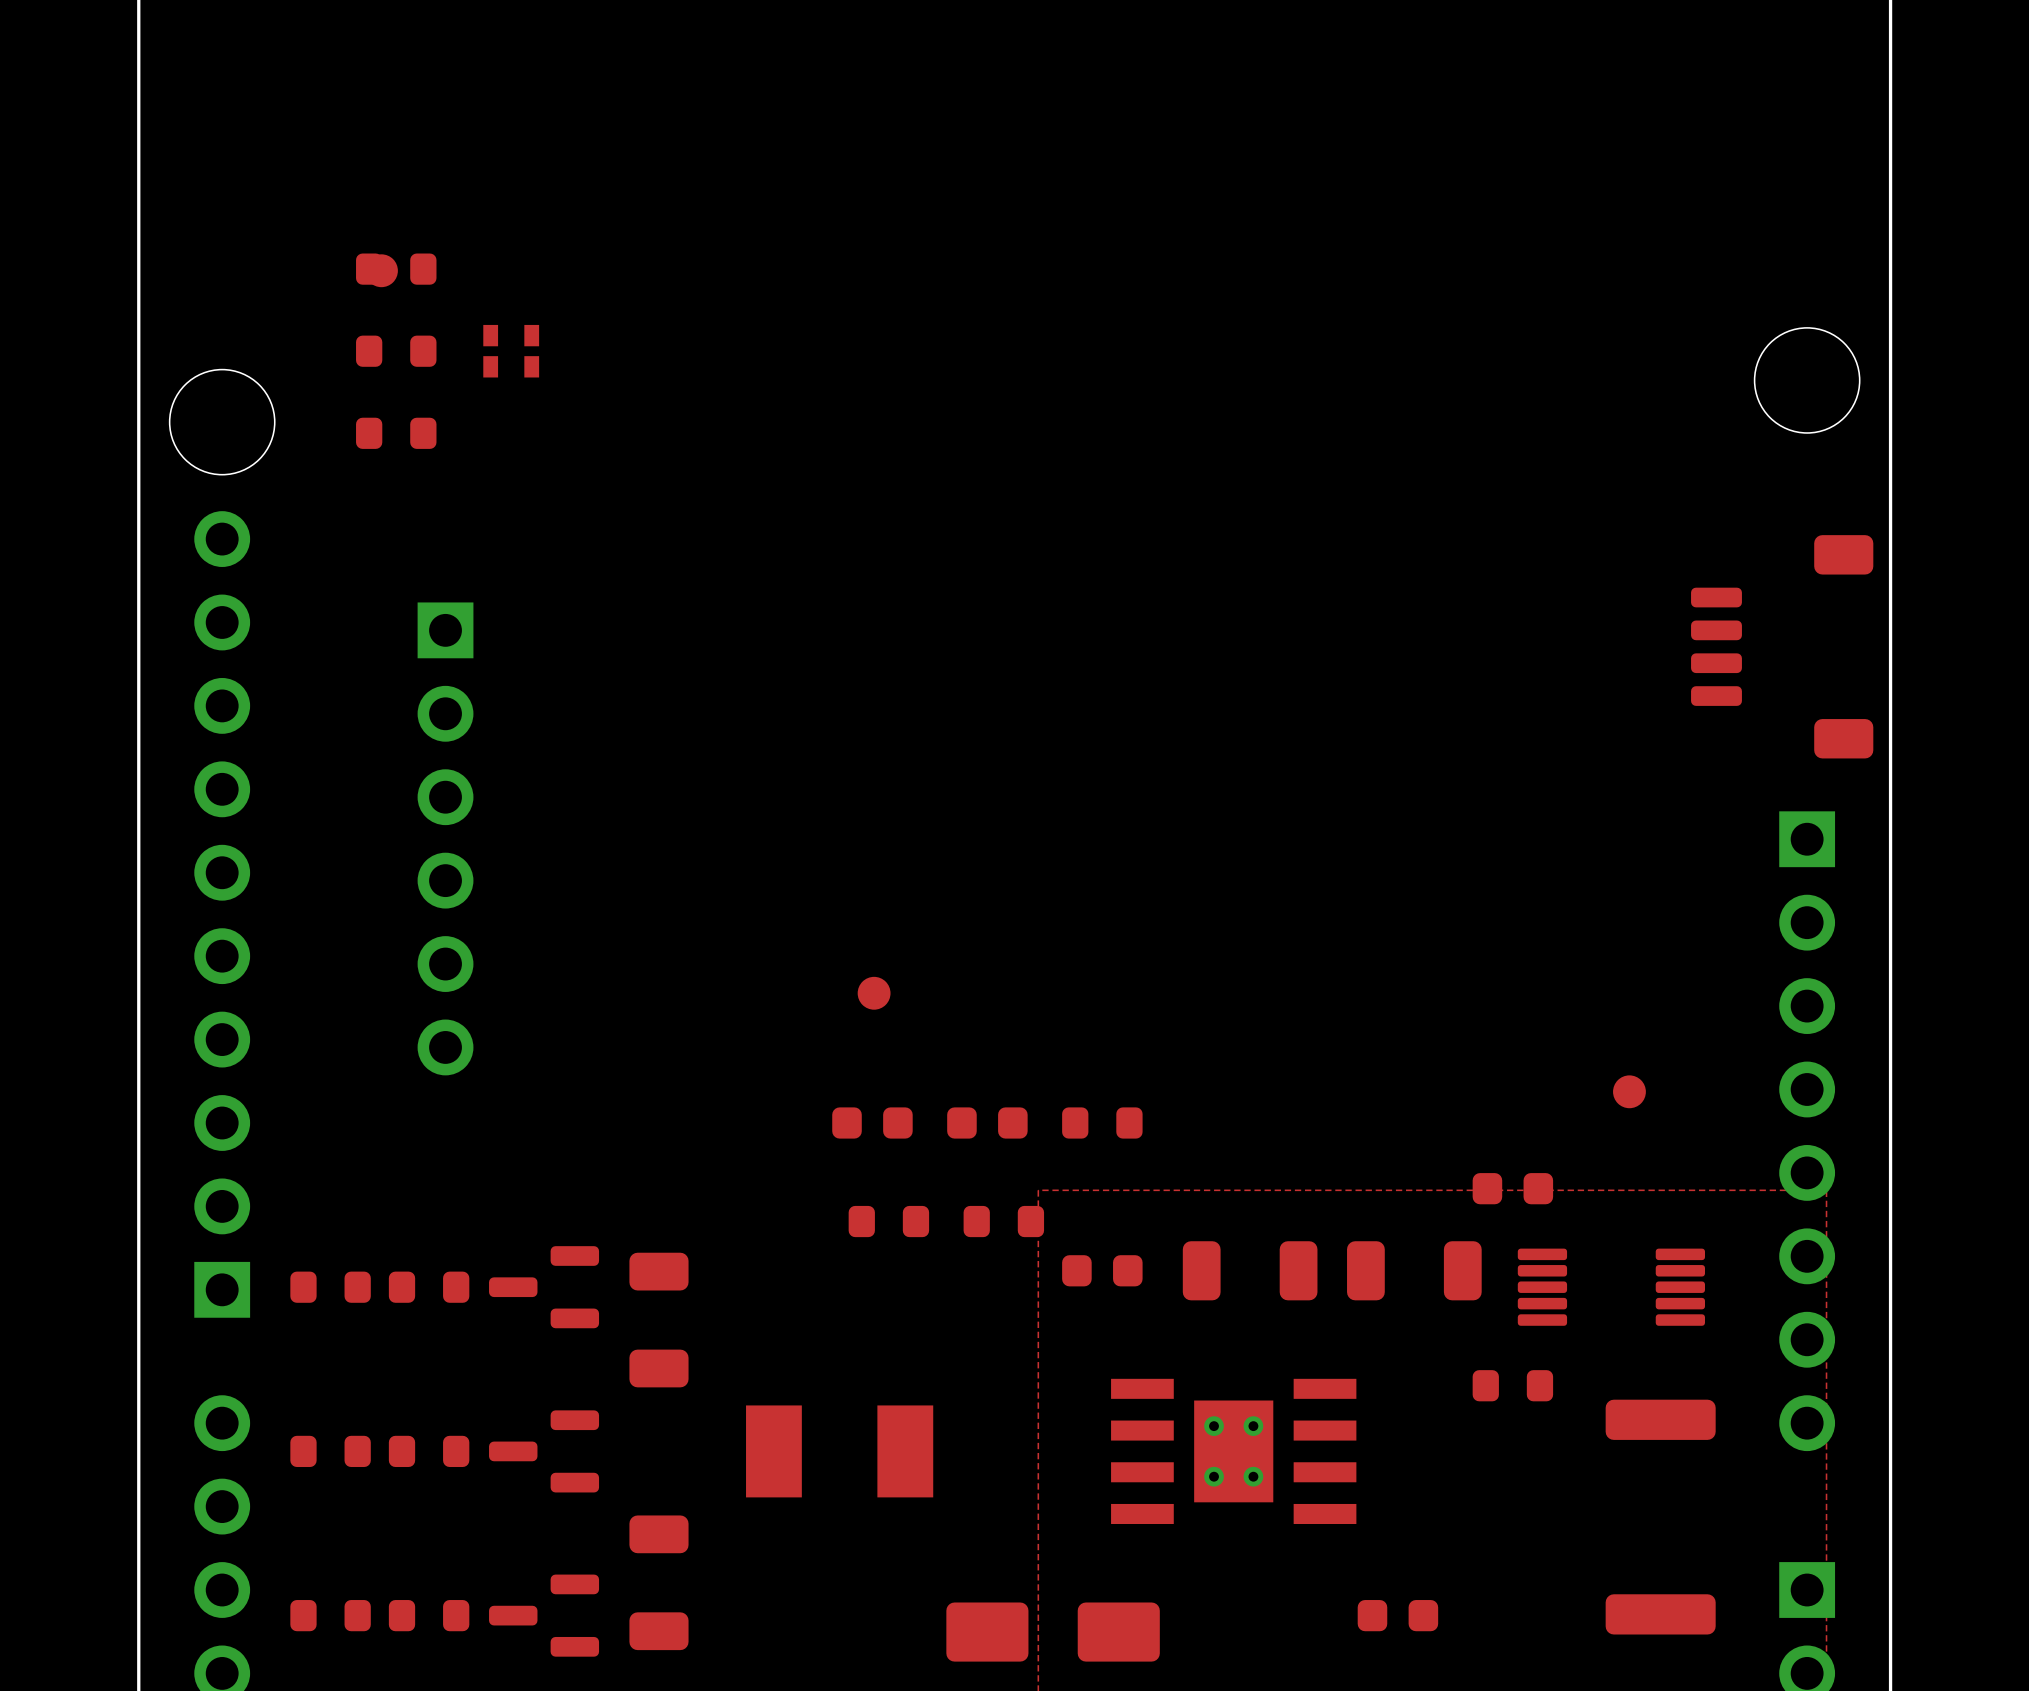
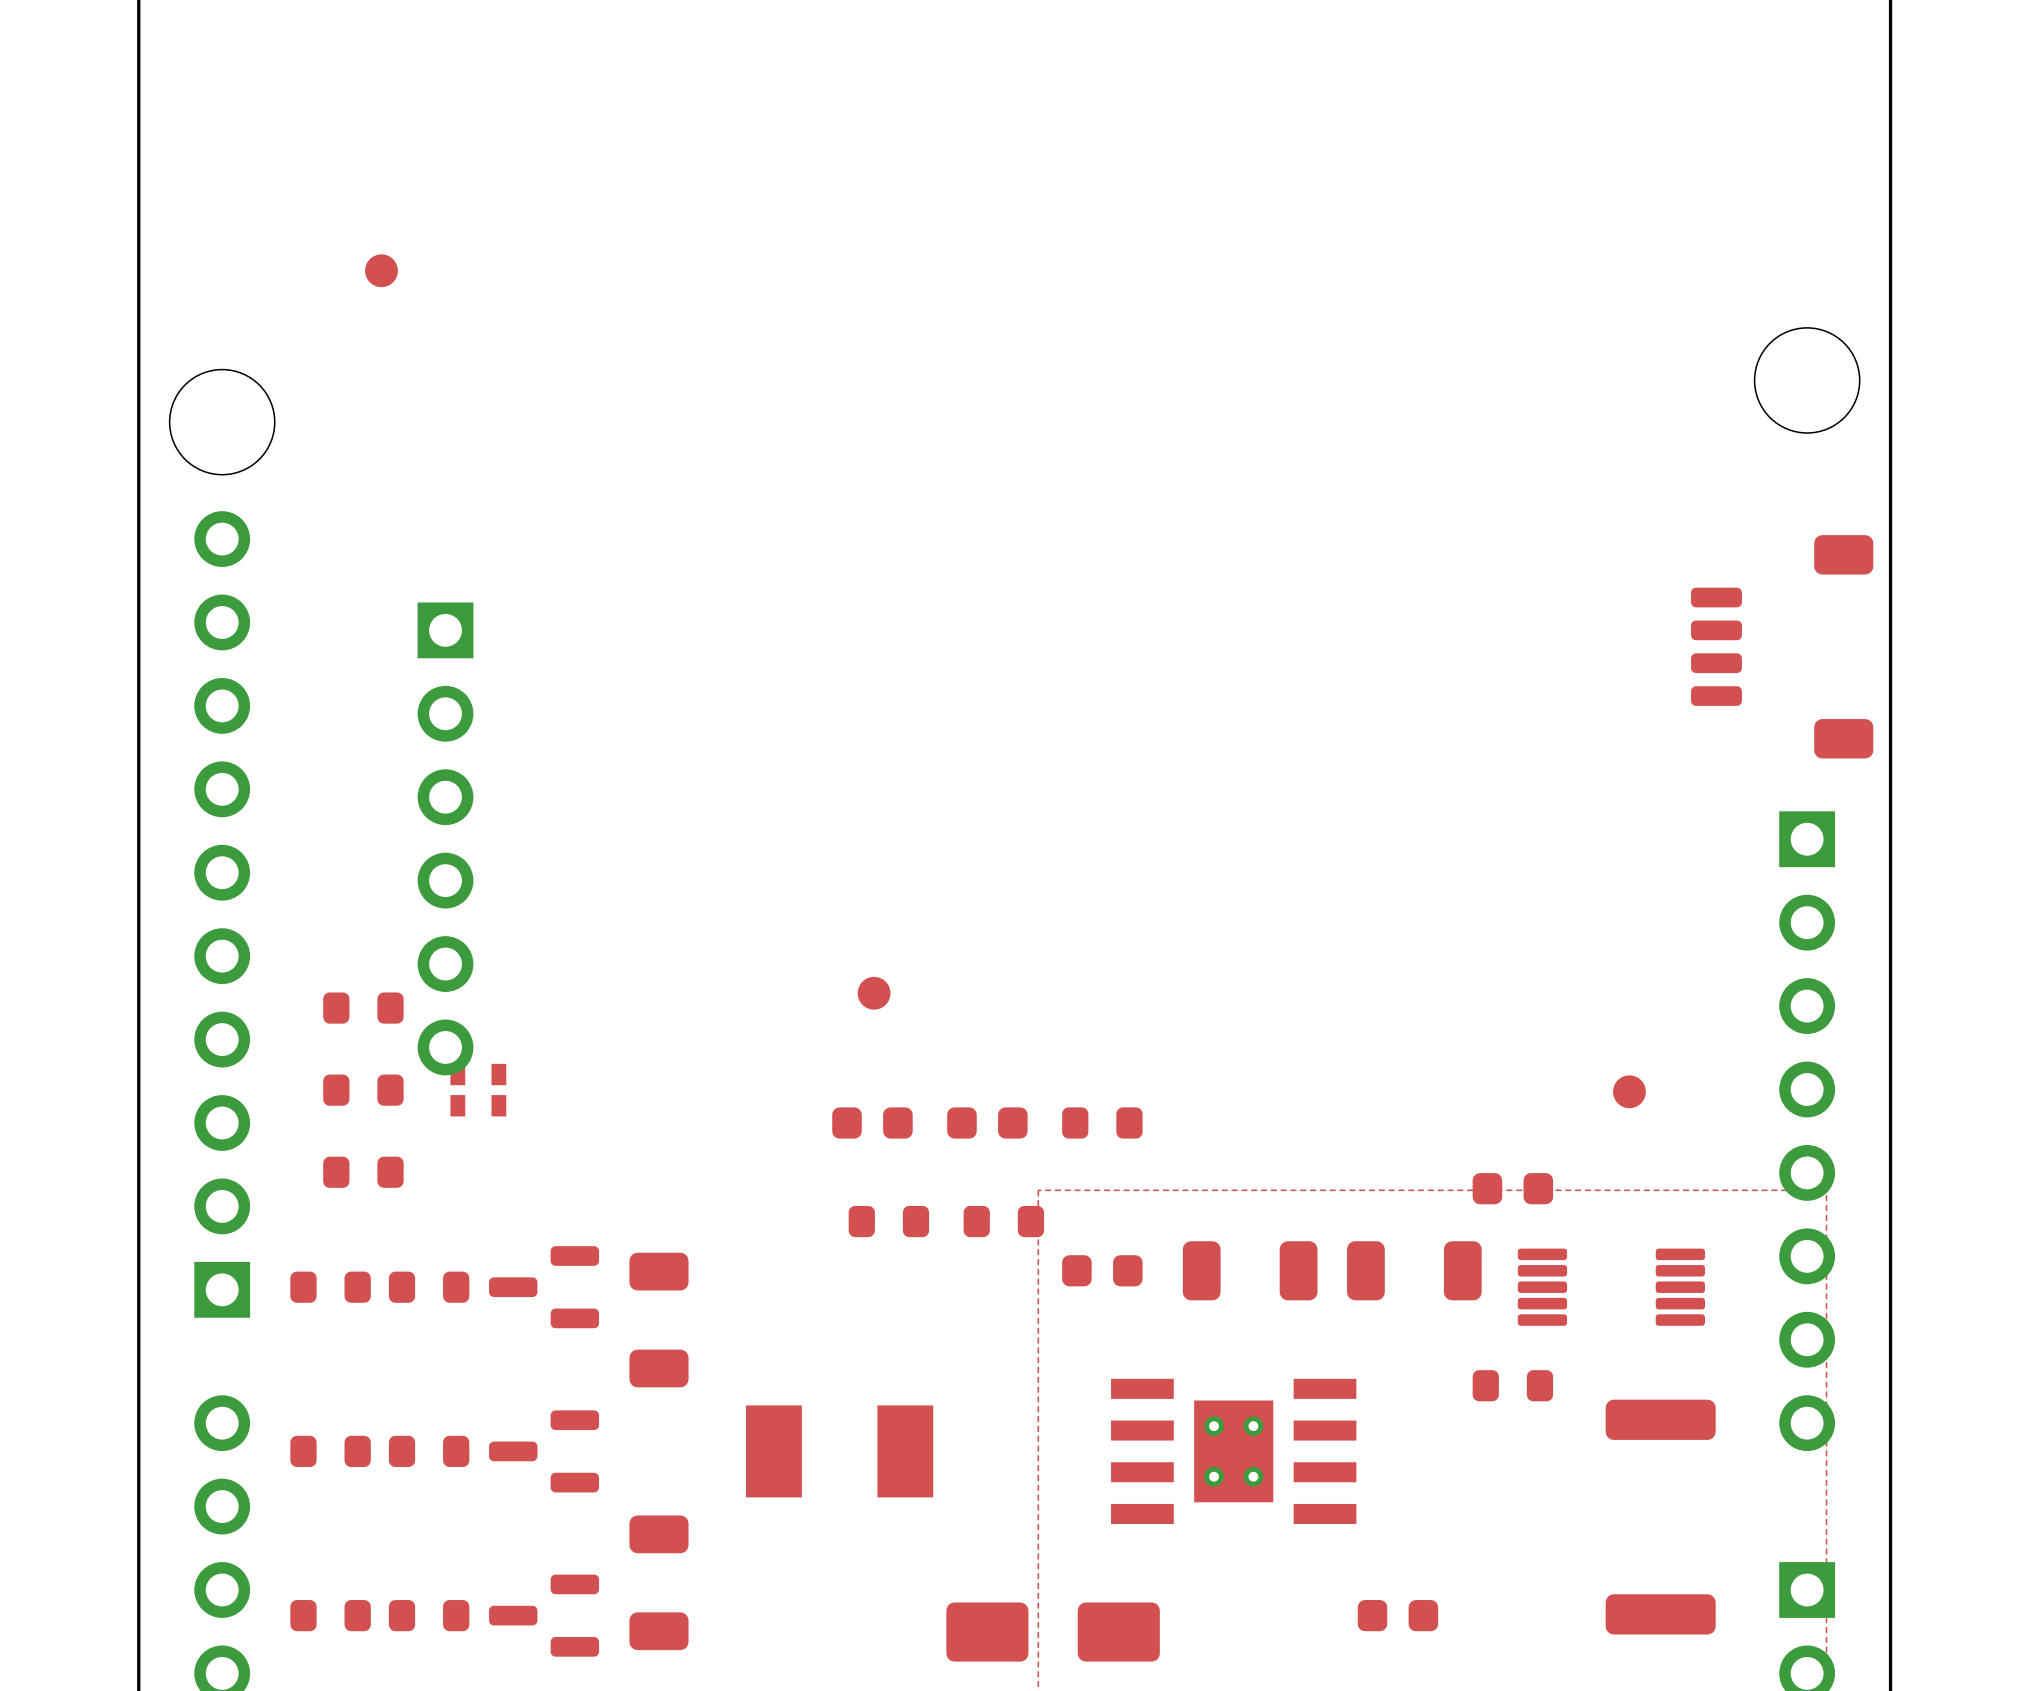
part: (396, 269) -> none
part: (396, 351) -> none
part position: (511, 351) -> (478, 1090)
part: (396, 433) -> none
part: none -> (363, 1008)
part: none -> (363, 1090)
part: none -> (363, 1172)

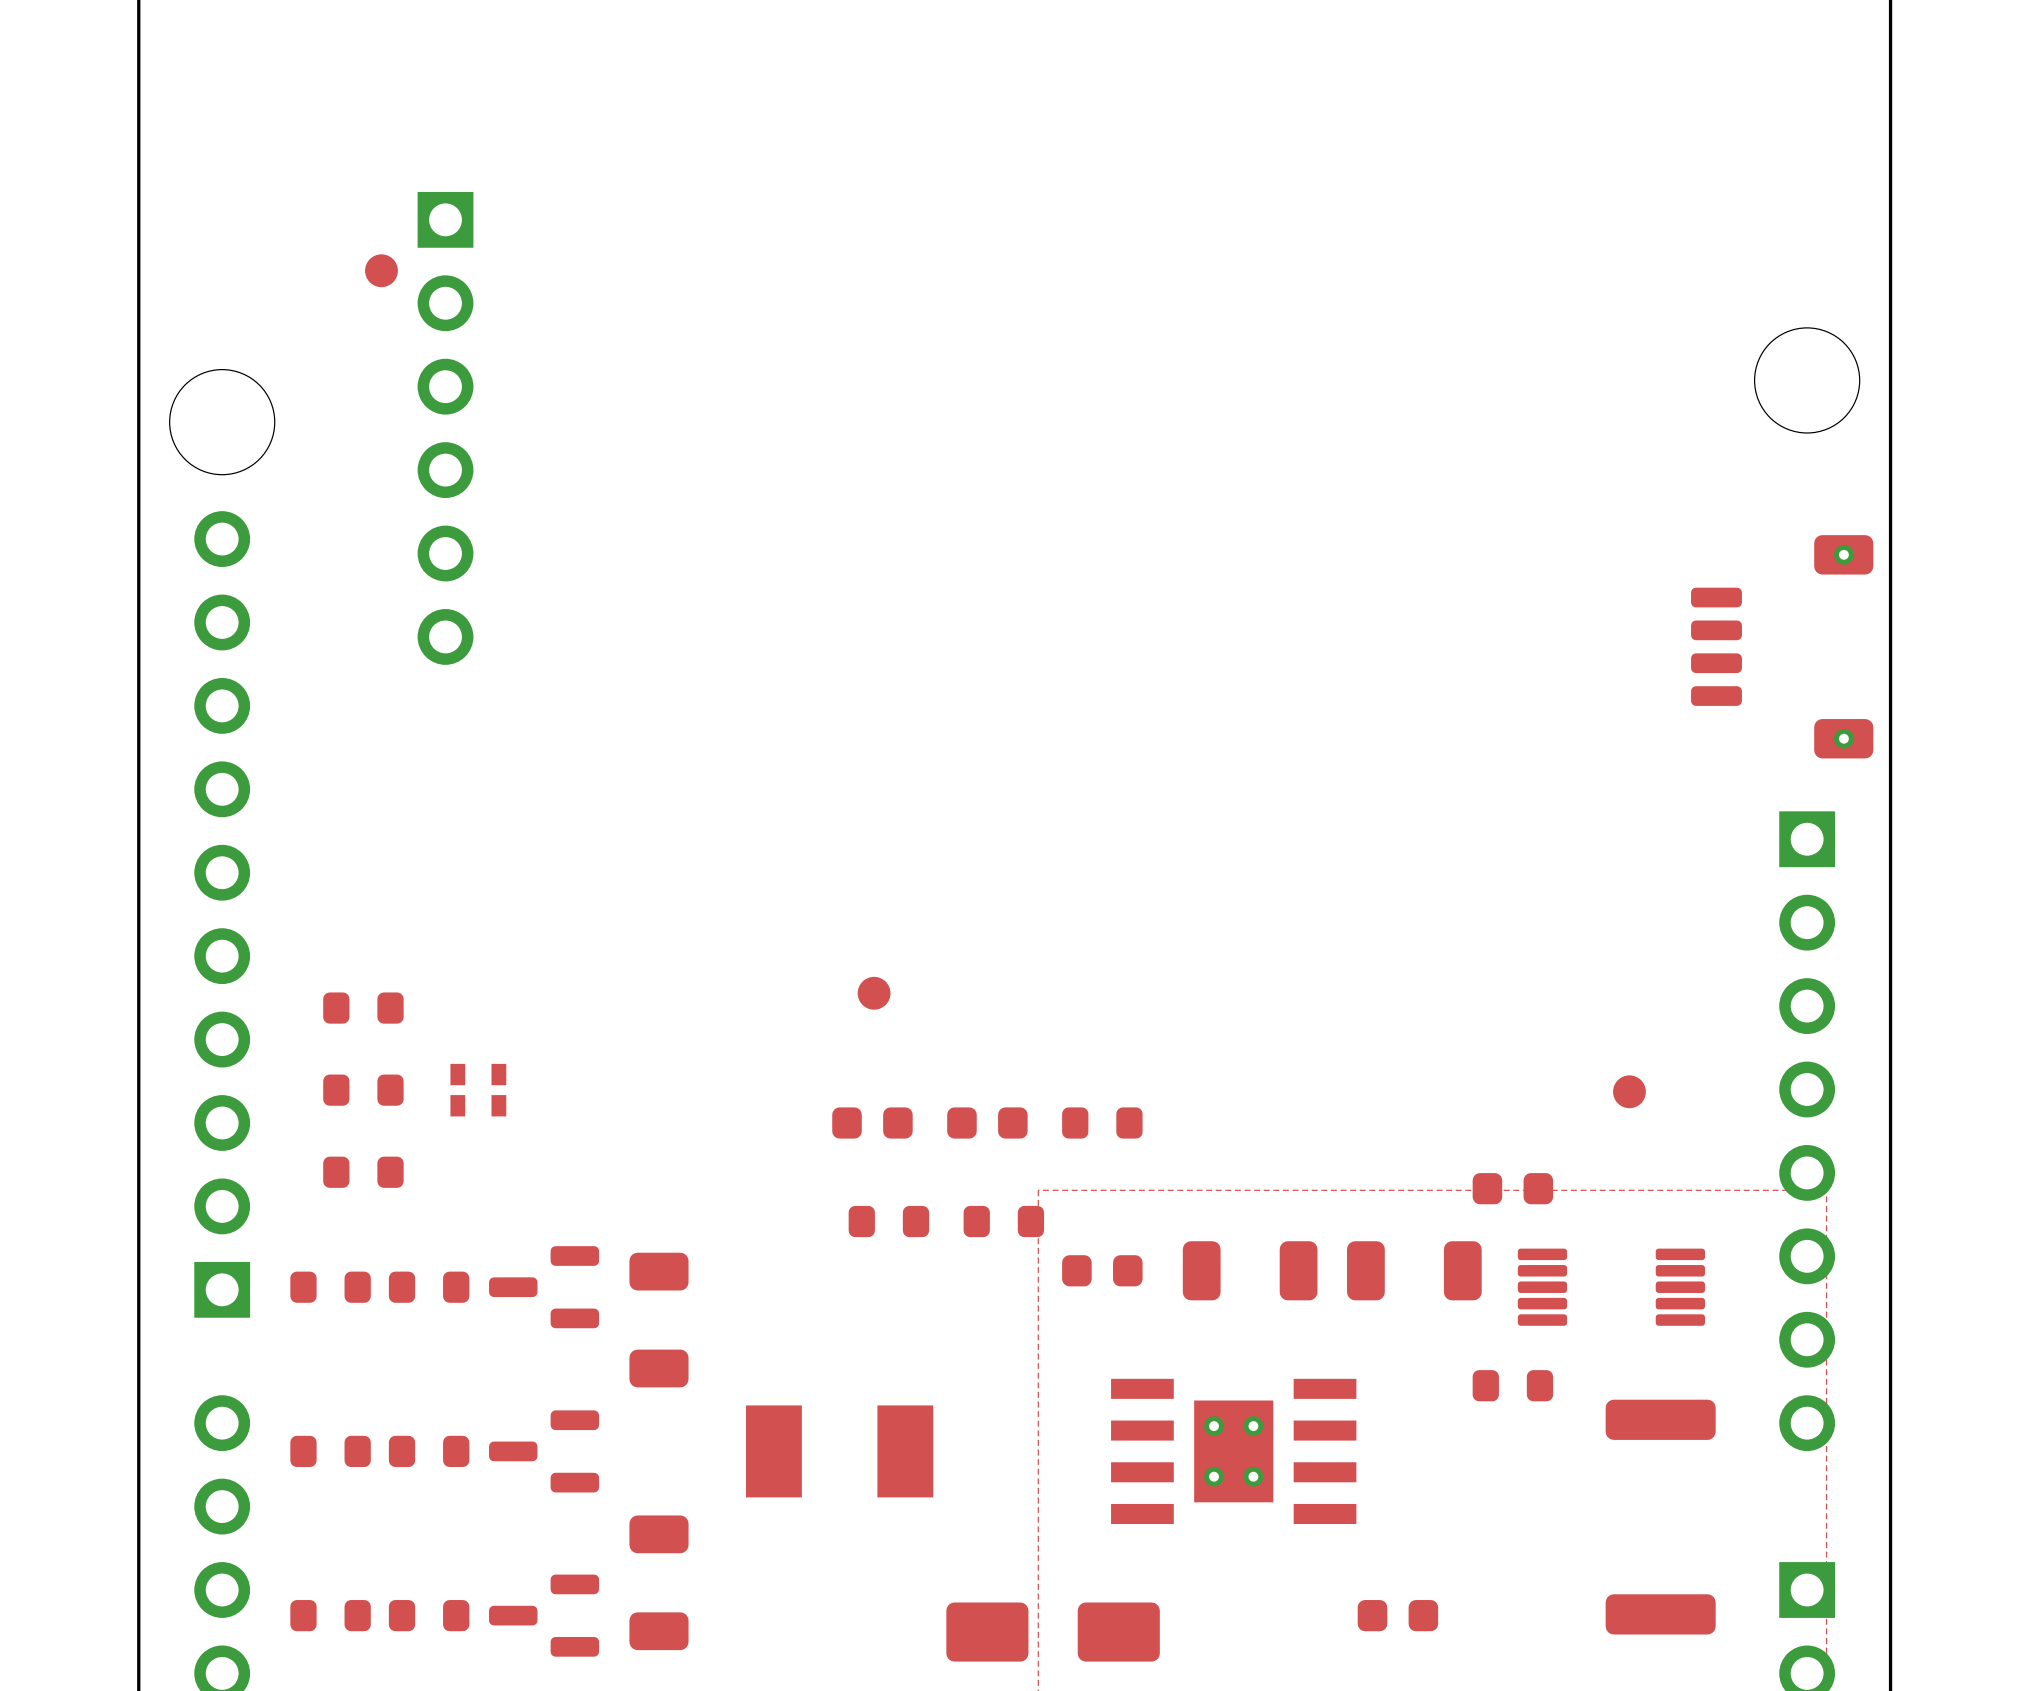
via: none -> (1843, 554)
via: none -> (1843, 738)
part position: (445, 838) -> (445, 428)

